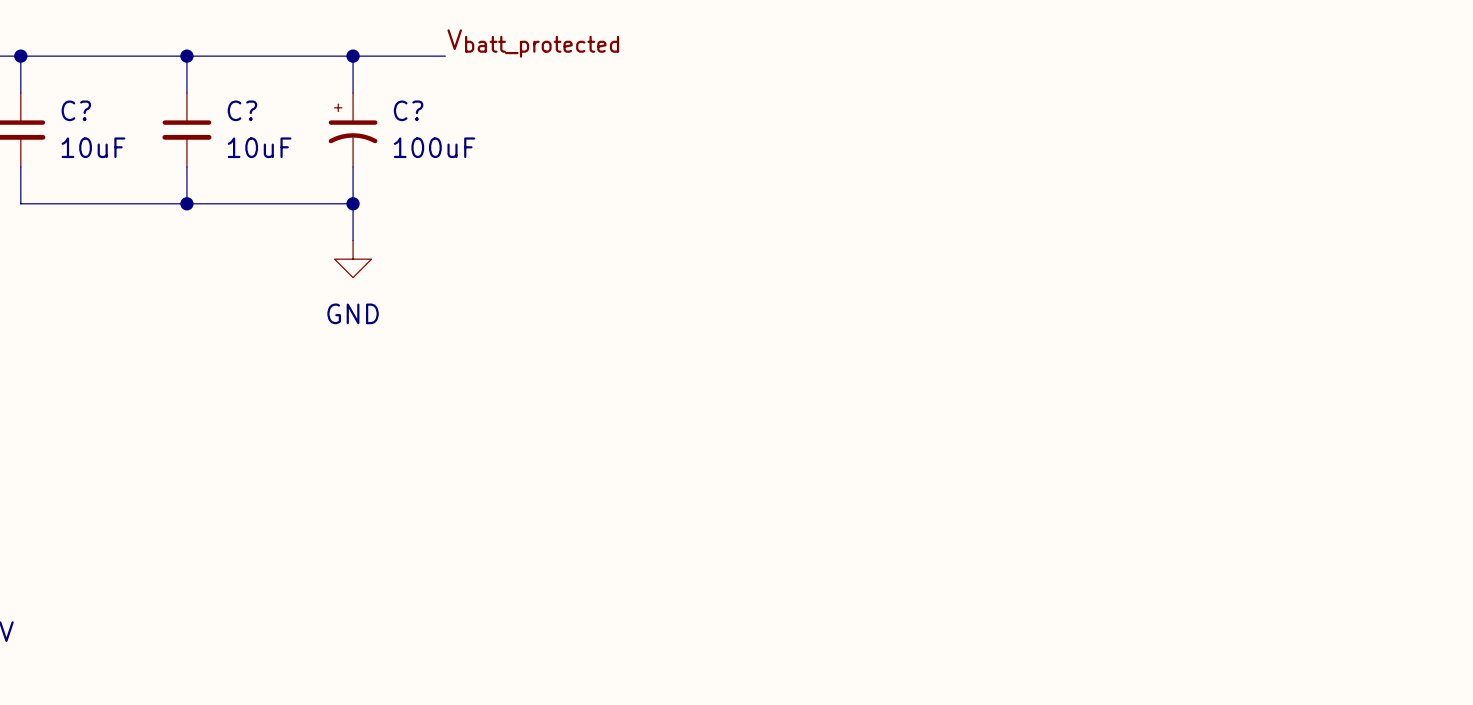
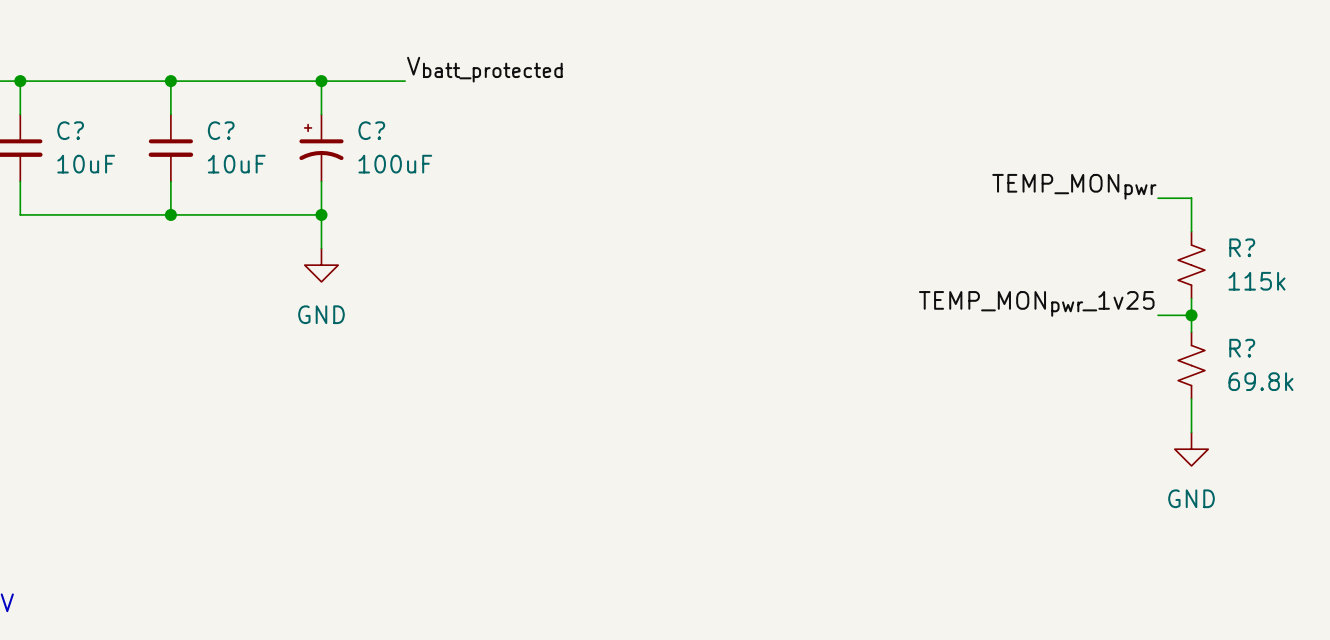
label: none -> TEMP_MONpwr (1074, 186)
wire: none -> (1158, 198) (1191, 198) (1191, 231)
R?: none -> 115k (1191, 265)
wire: none -> (1191, 298) (1191, 332)
label: none -> TEMP_MONpwr_1v25 (1036, 303)
wire: none -> (1158, 315) (1191, 315)
junction: none -> (1191, 315)
R?: none -> 69.8k (1191, 365)
wire: none -> (1191, 399) (1191, 432)
power symbol: none -> GND (1191, 449)

